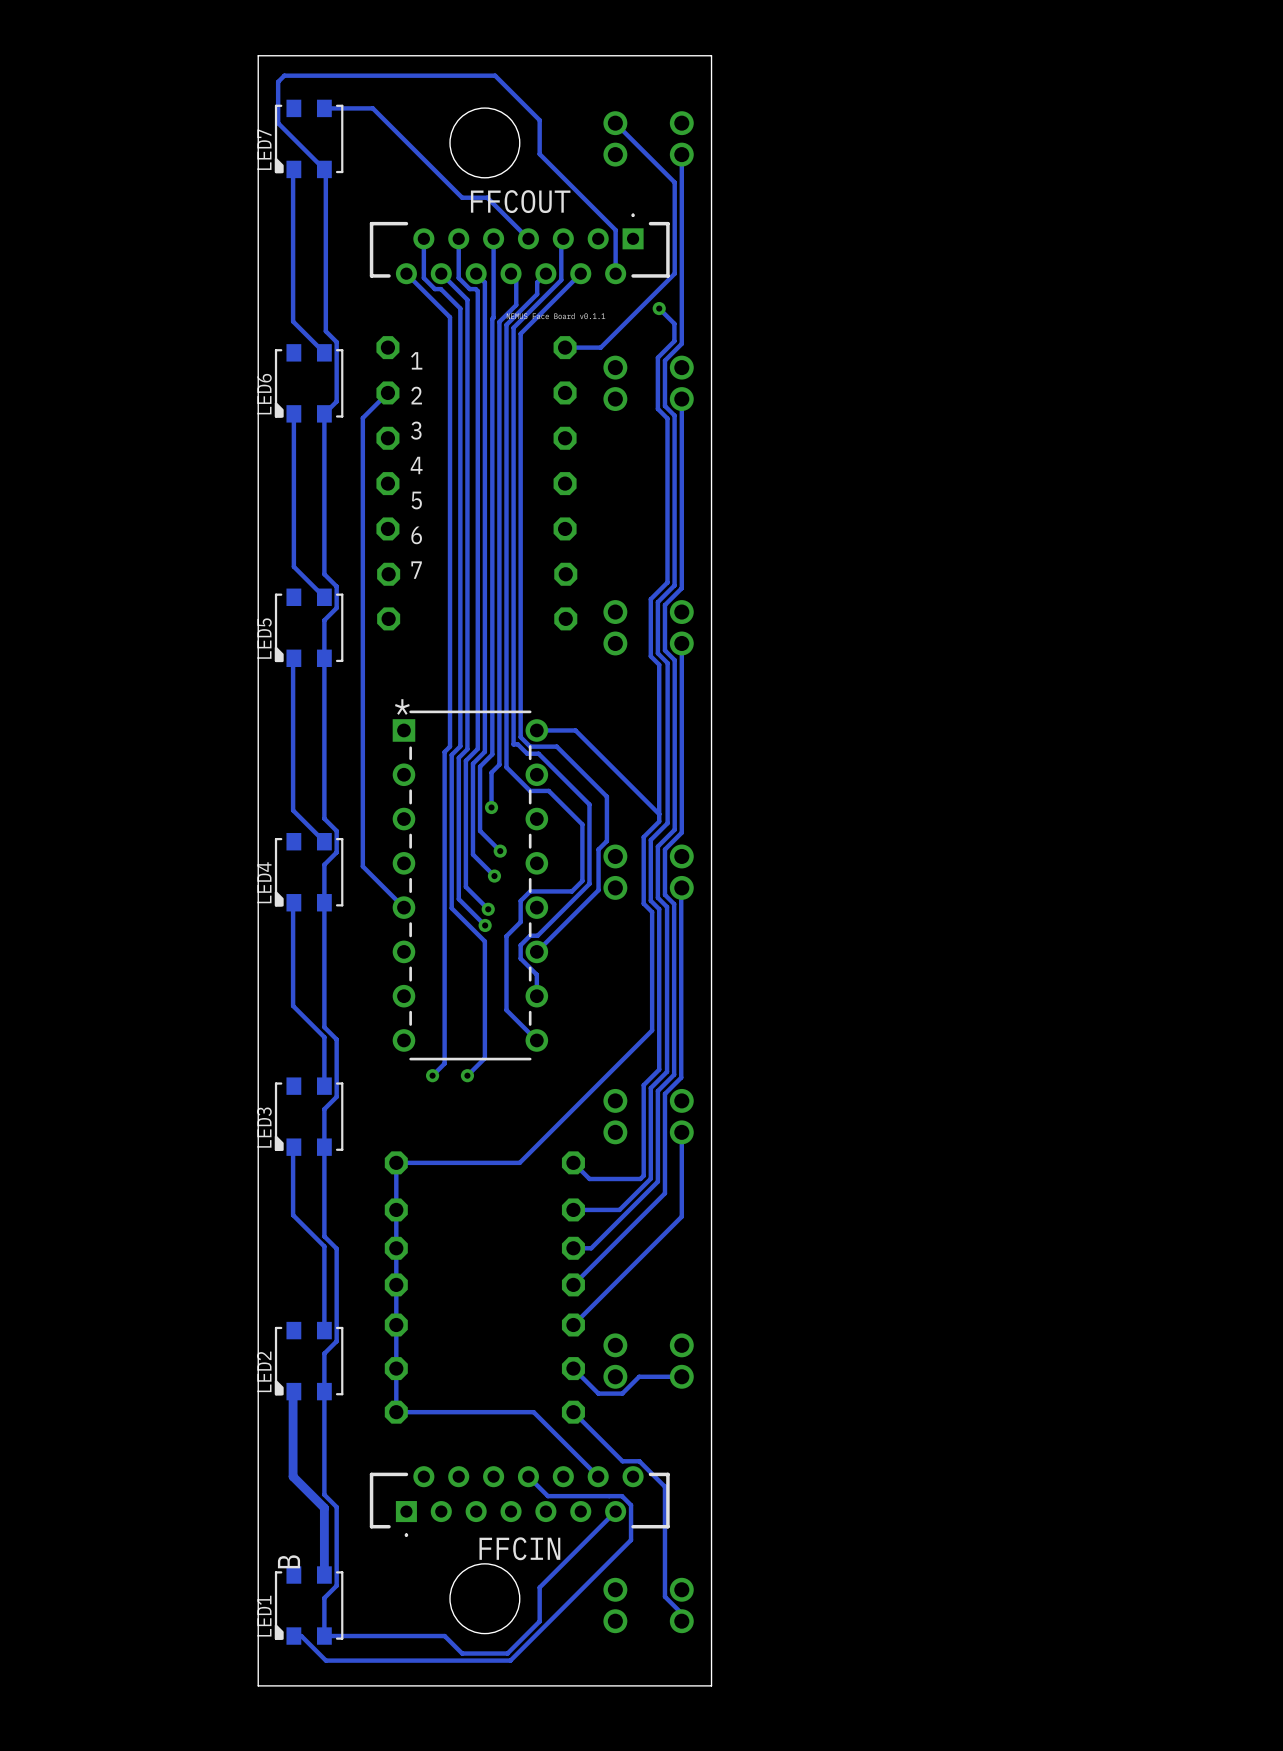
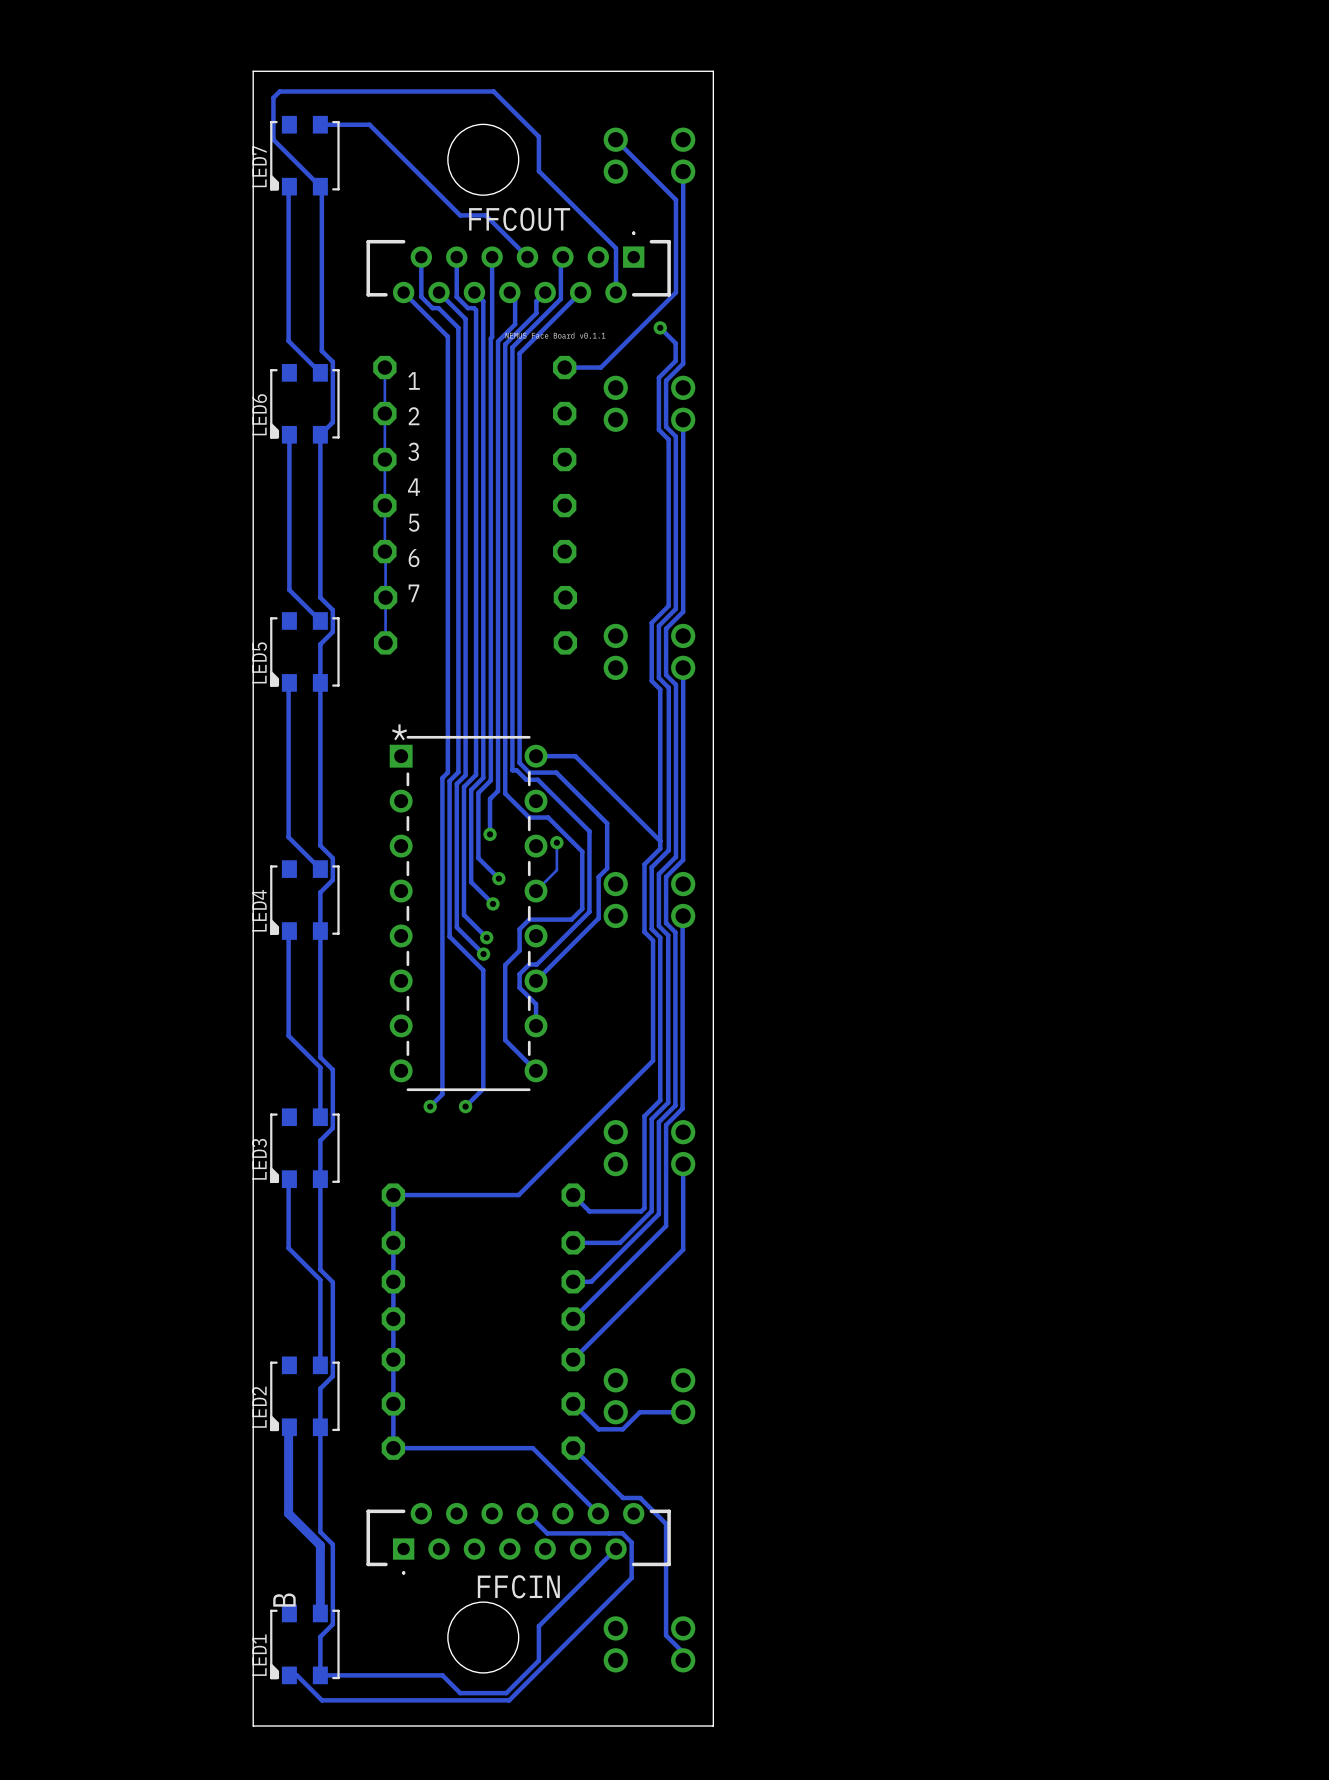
track: none -> (384, 367) (385, 642)
track: (387, 392) (362, 418) (362, 866) (403, 907) -> none
track: none -> (556, 842) (556, 870) (536, 891)
via: none -> (556, 842)

